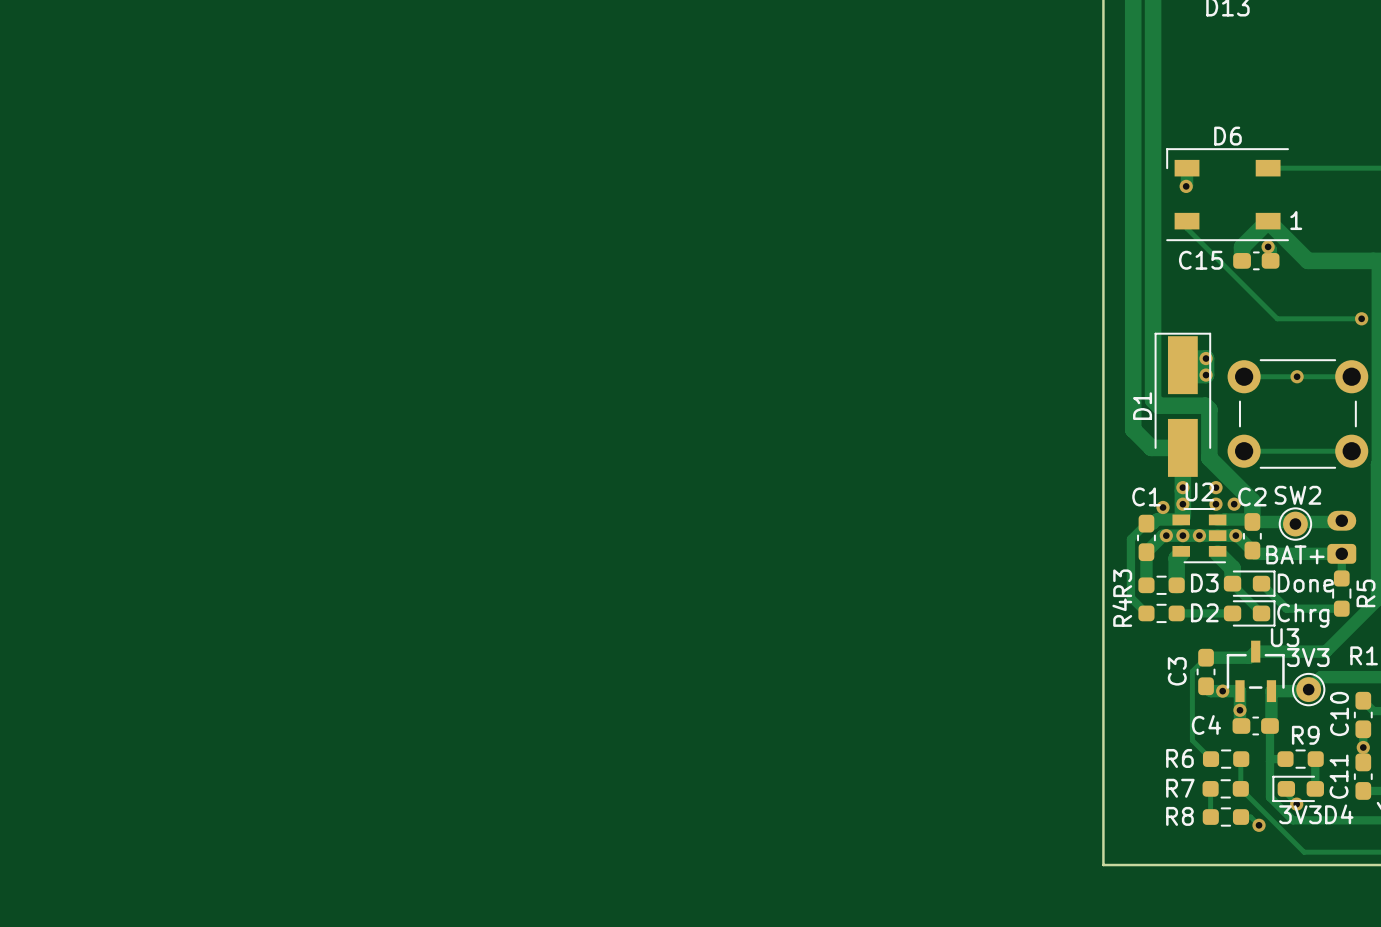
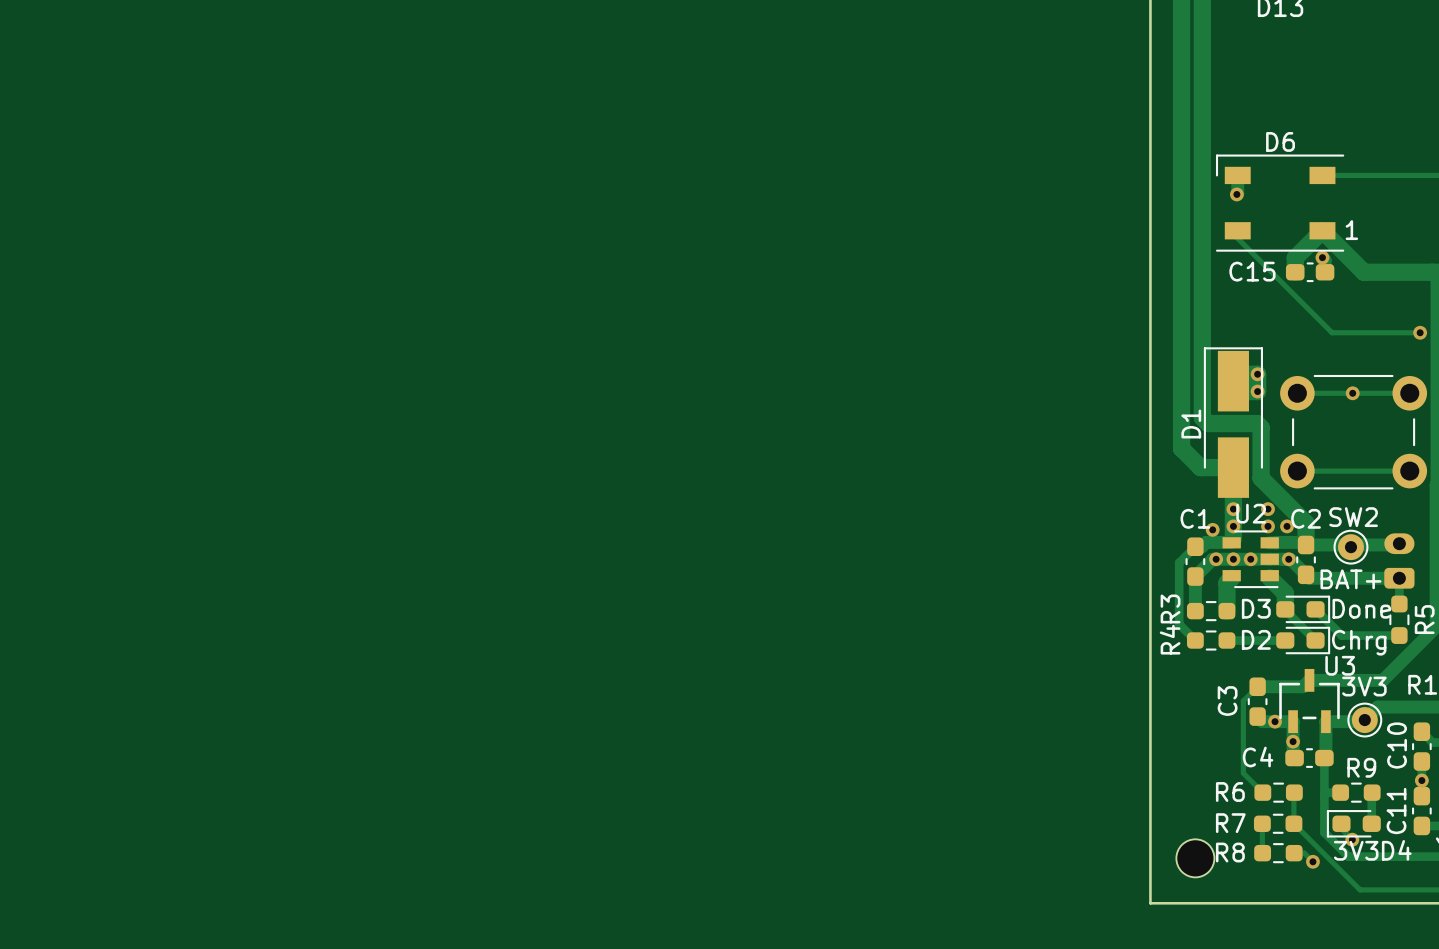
part: none -> (1195, 858)

